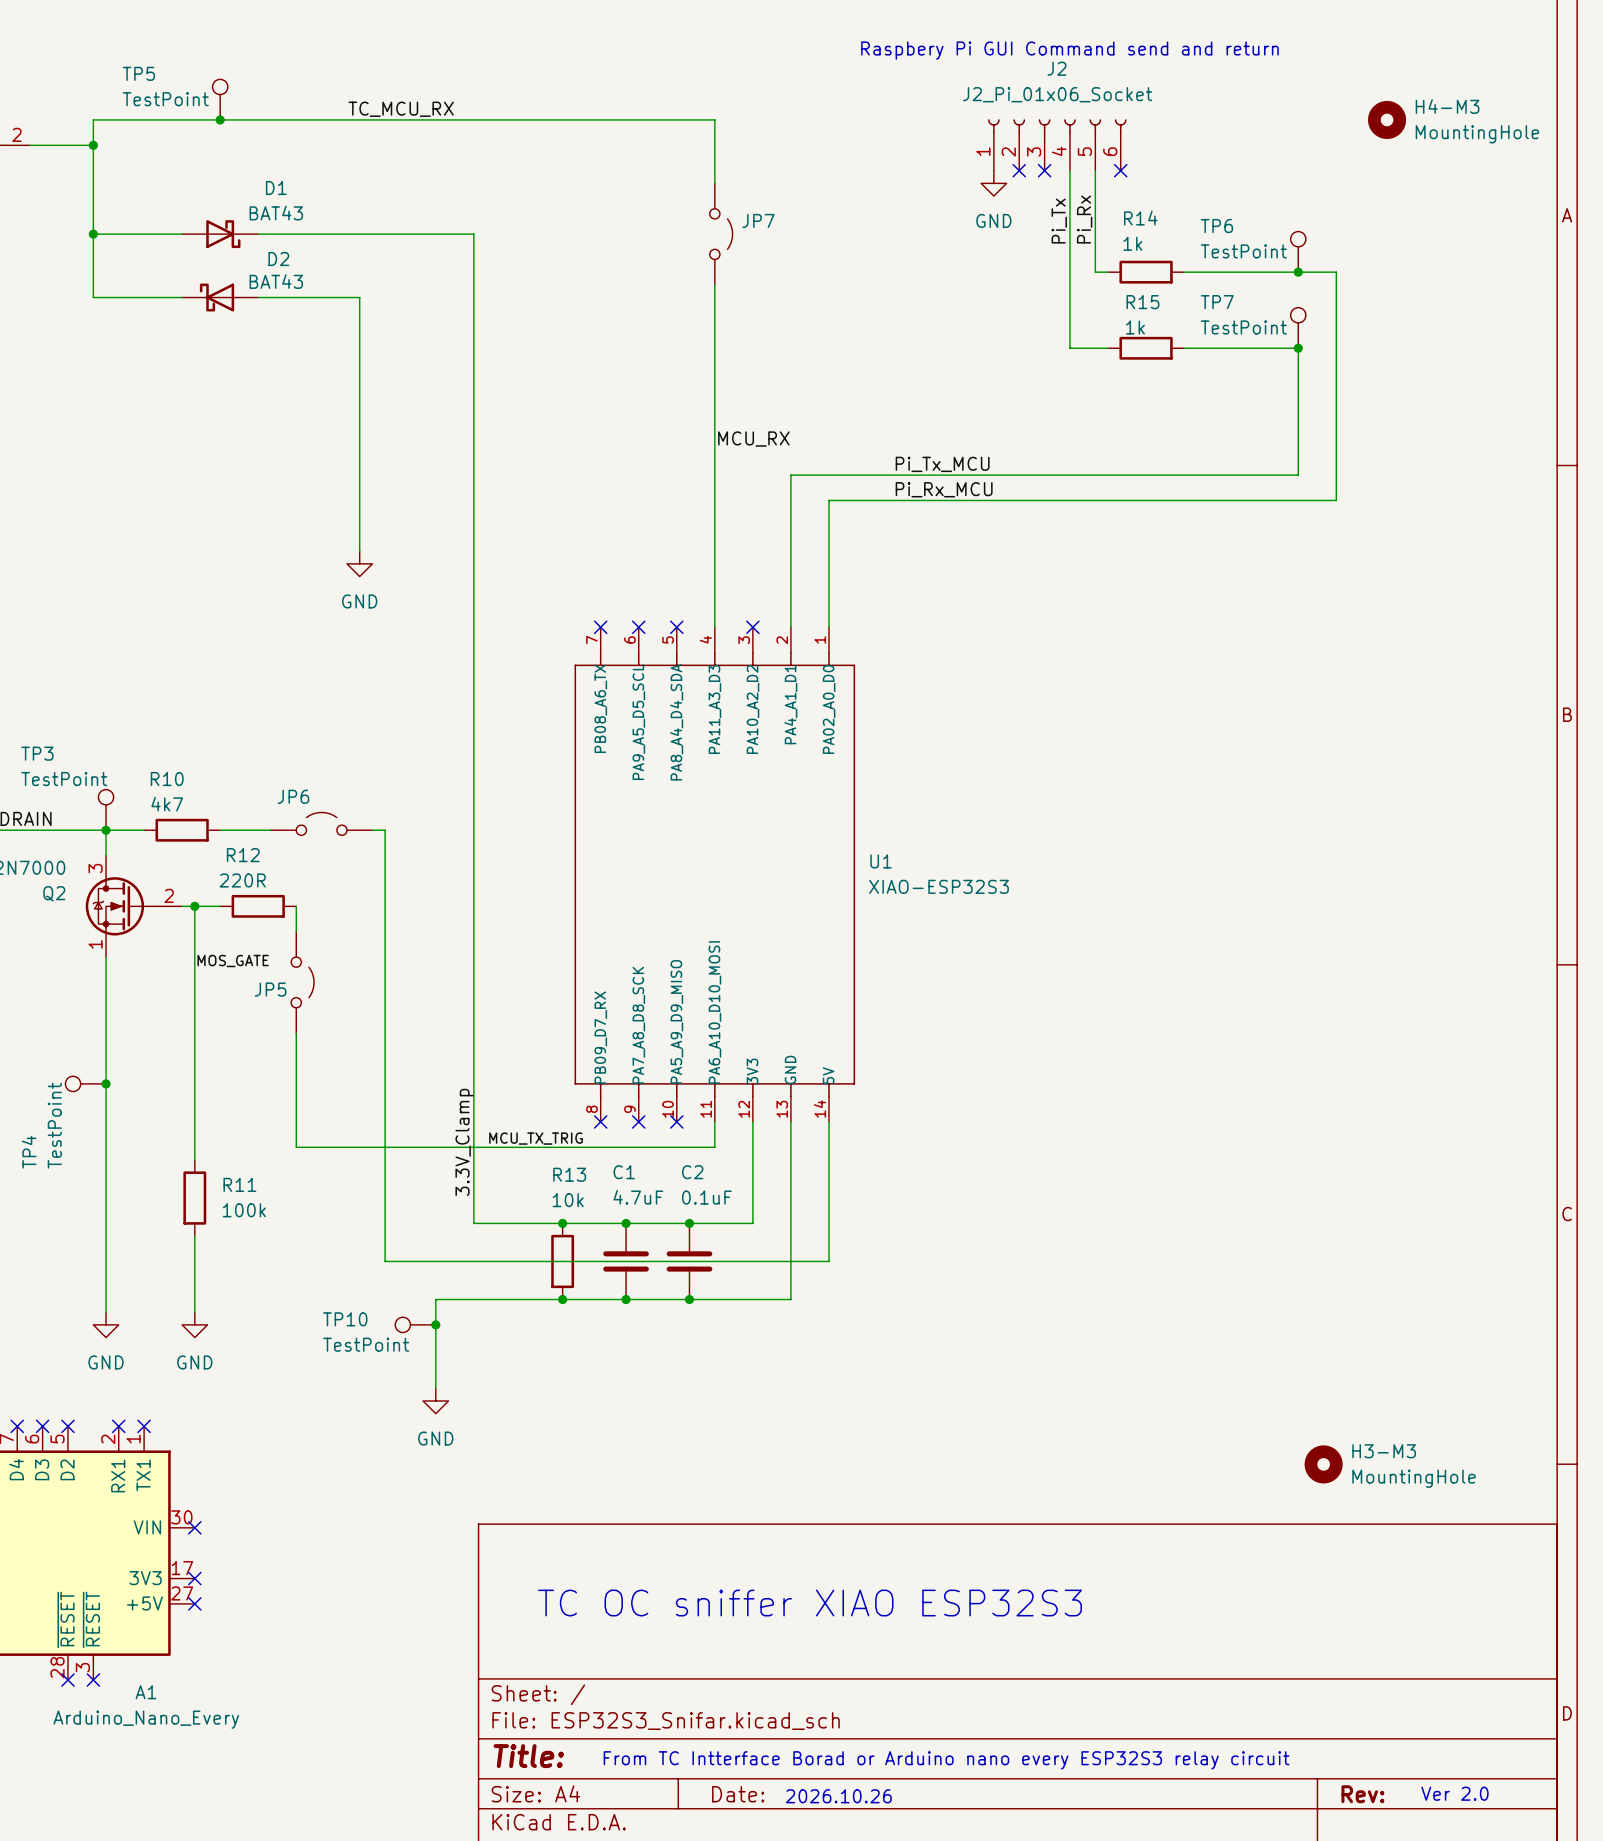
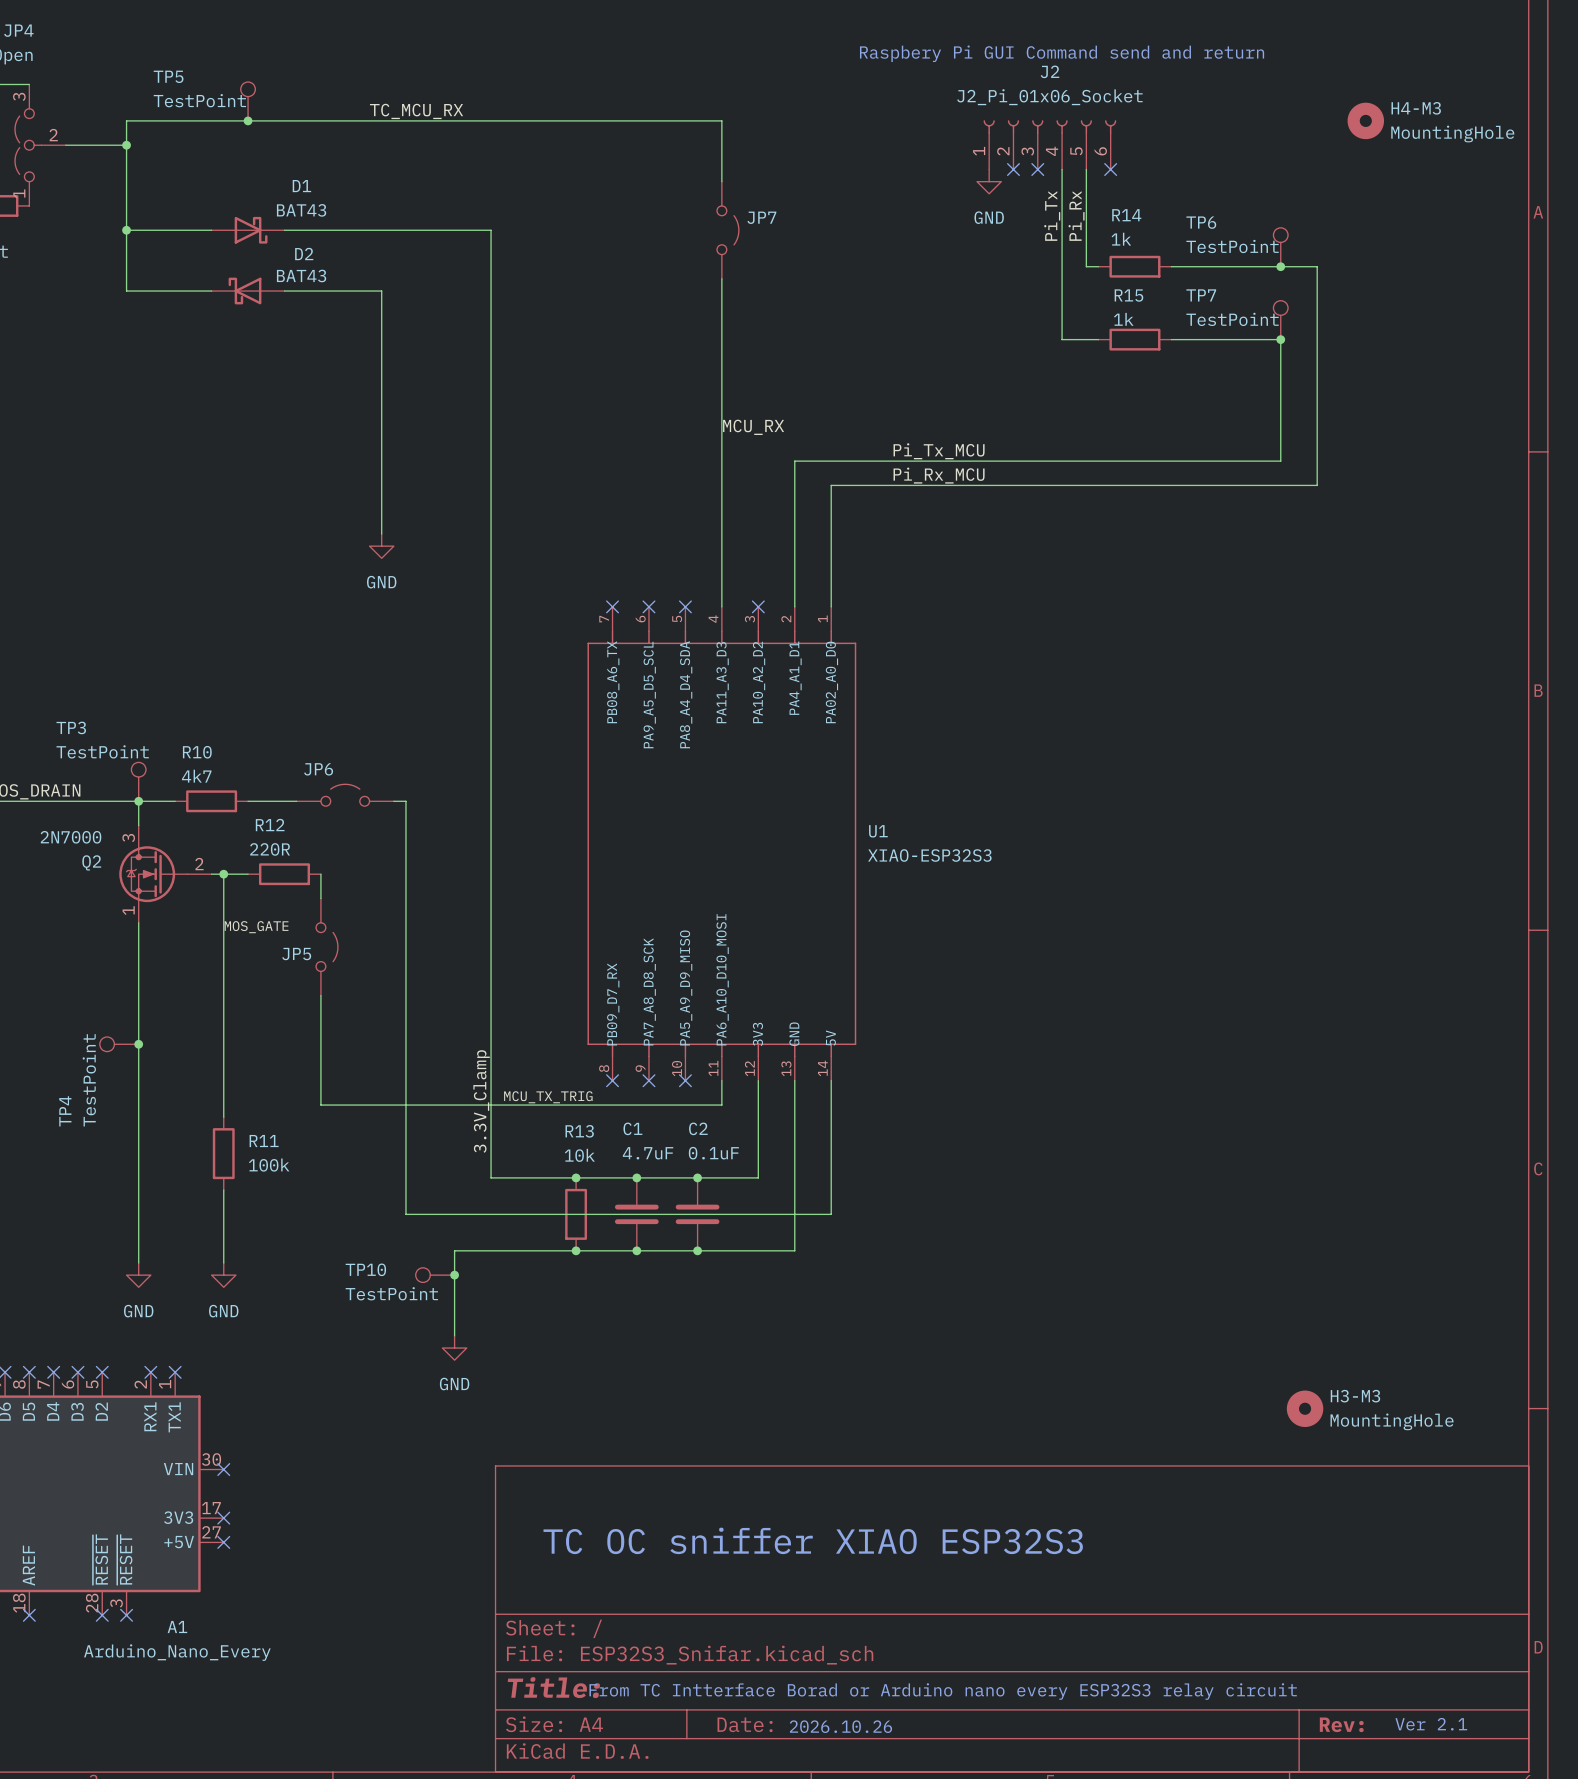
text: Ver 2.0 (1454, 1793) -> Ver 2.1 (1431, 1724)

